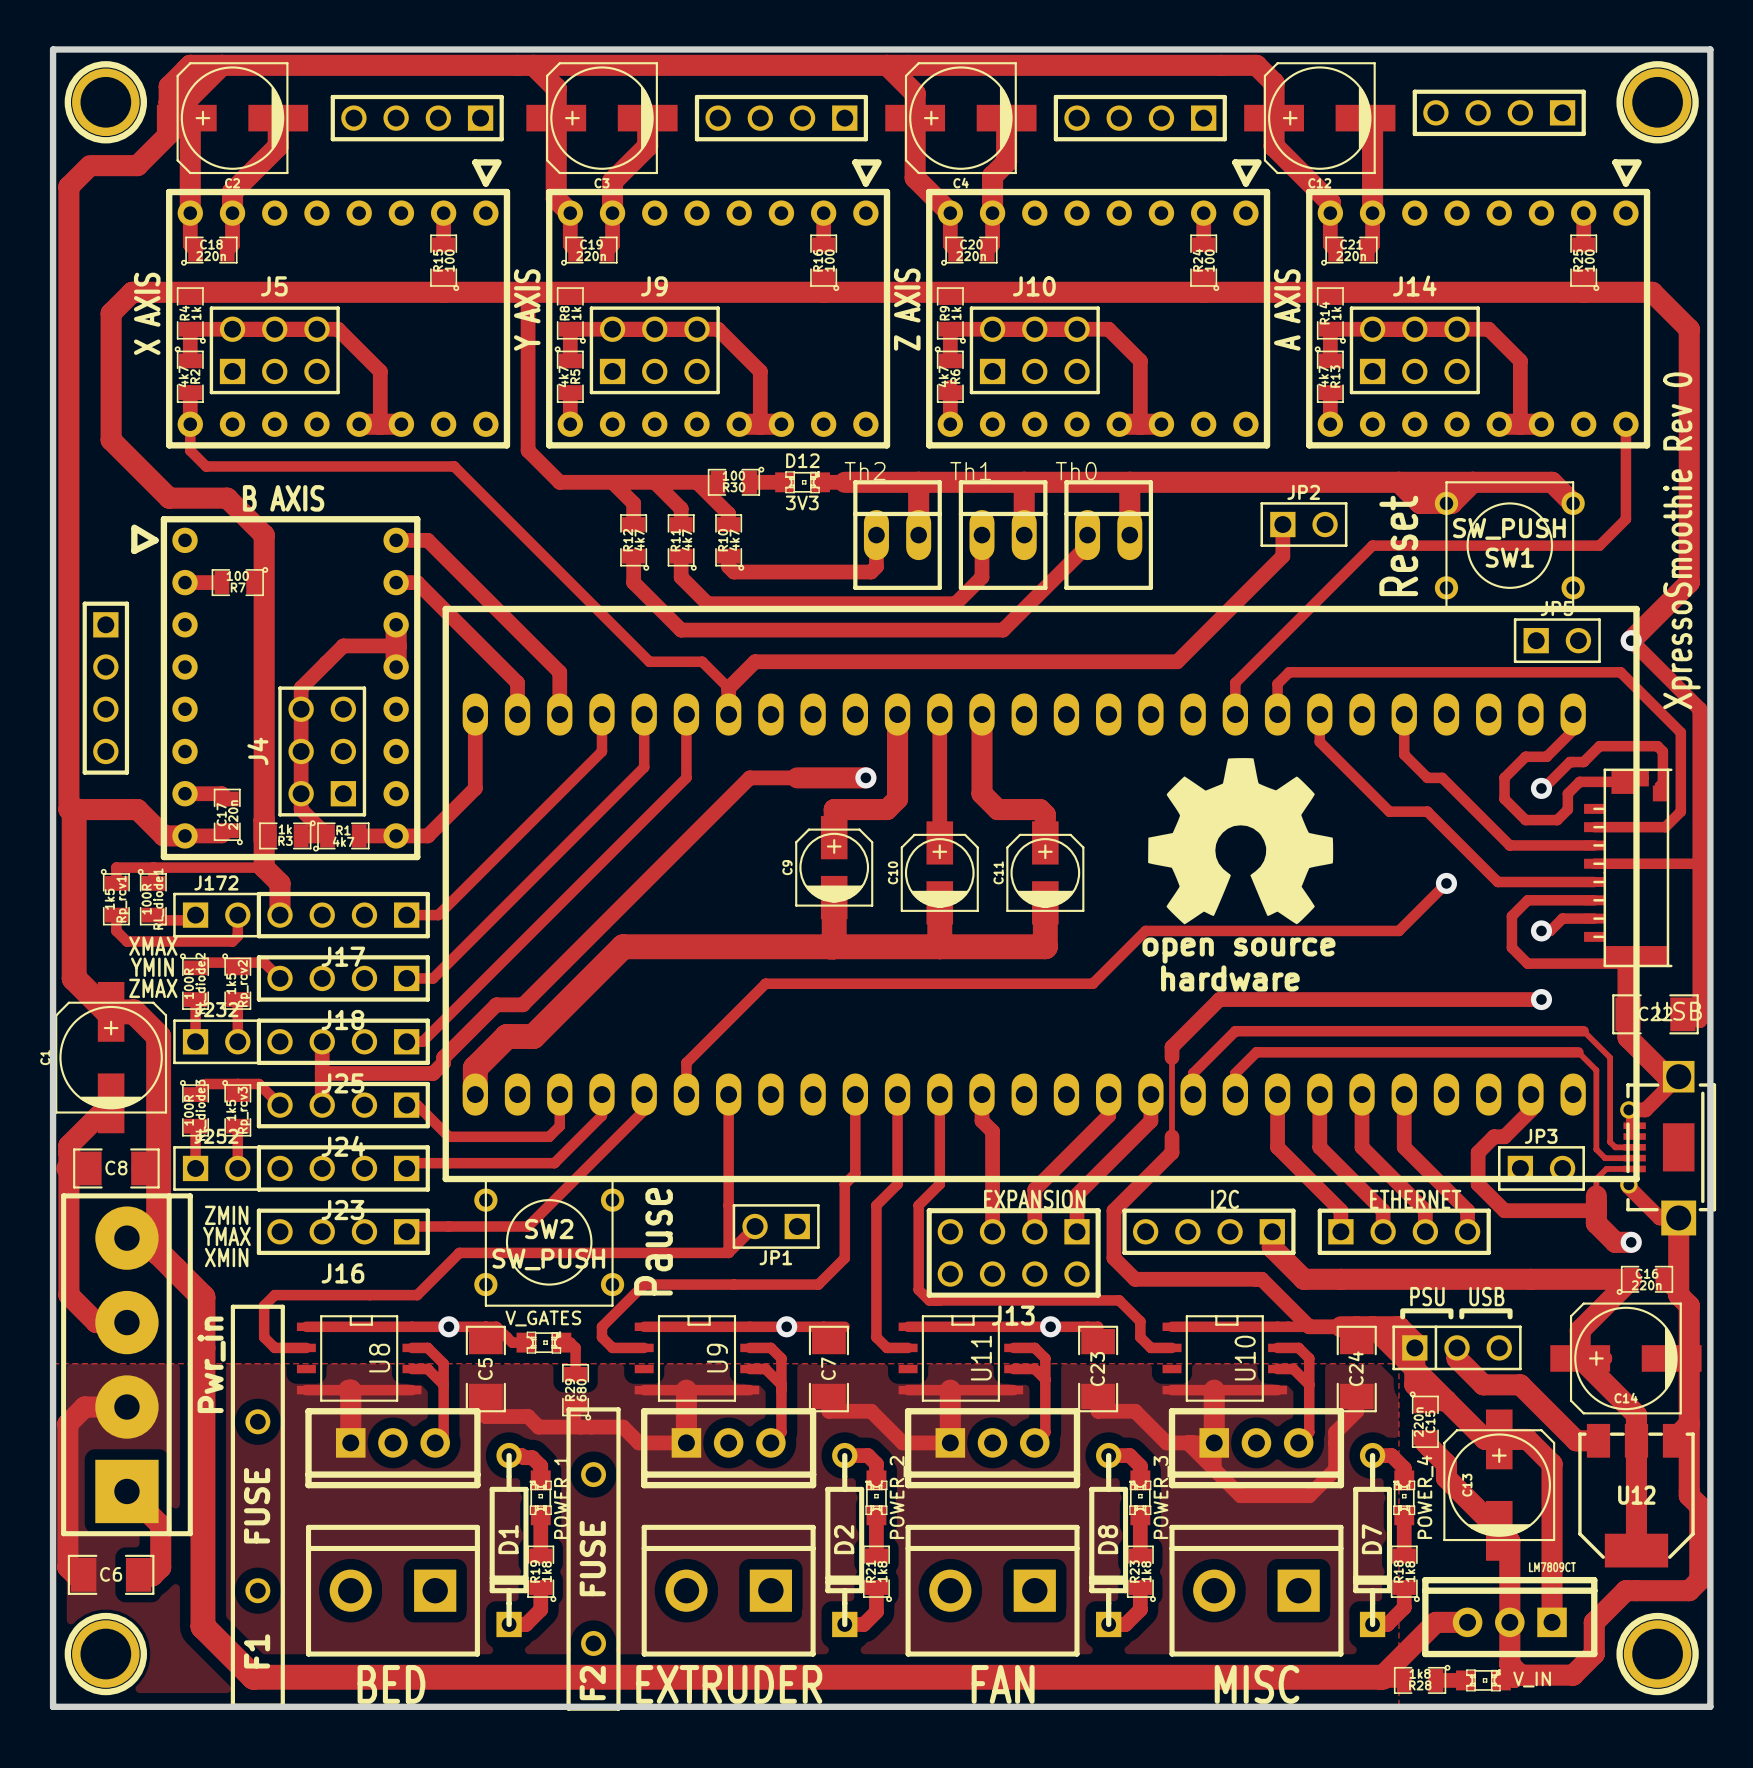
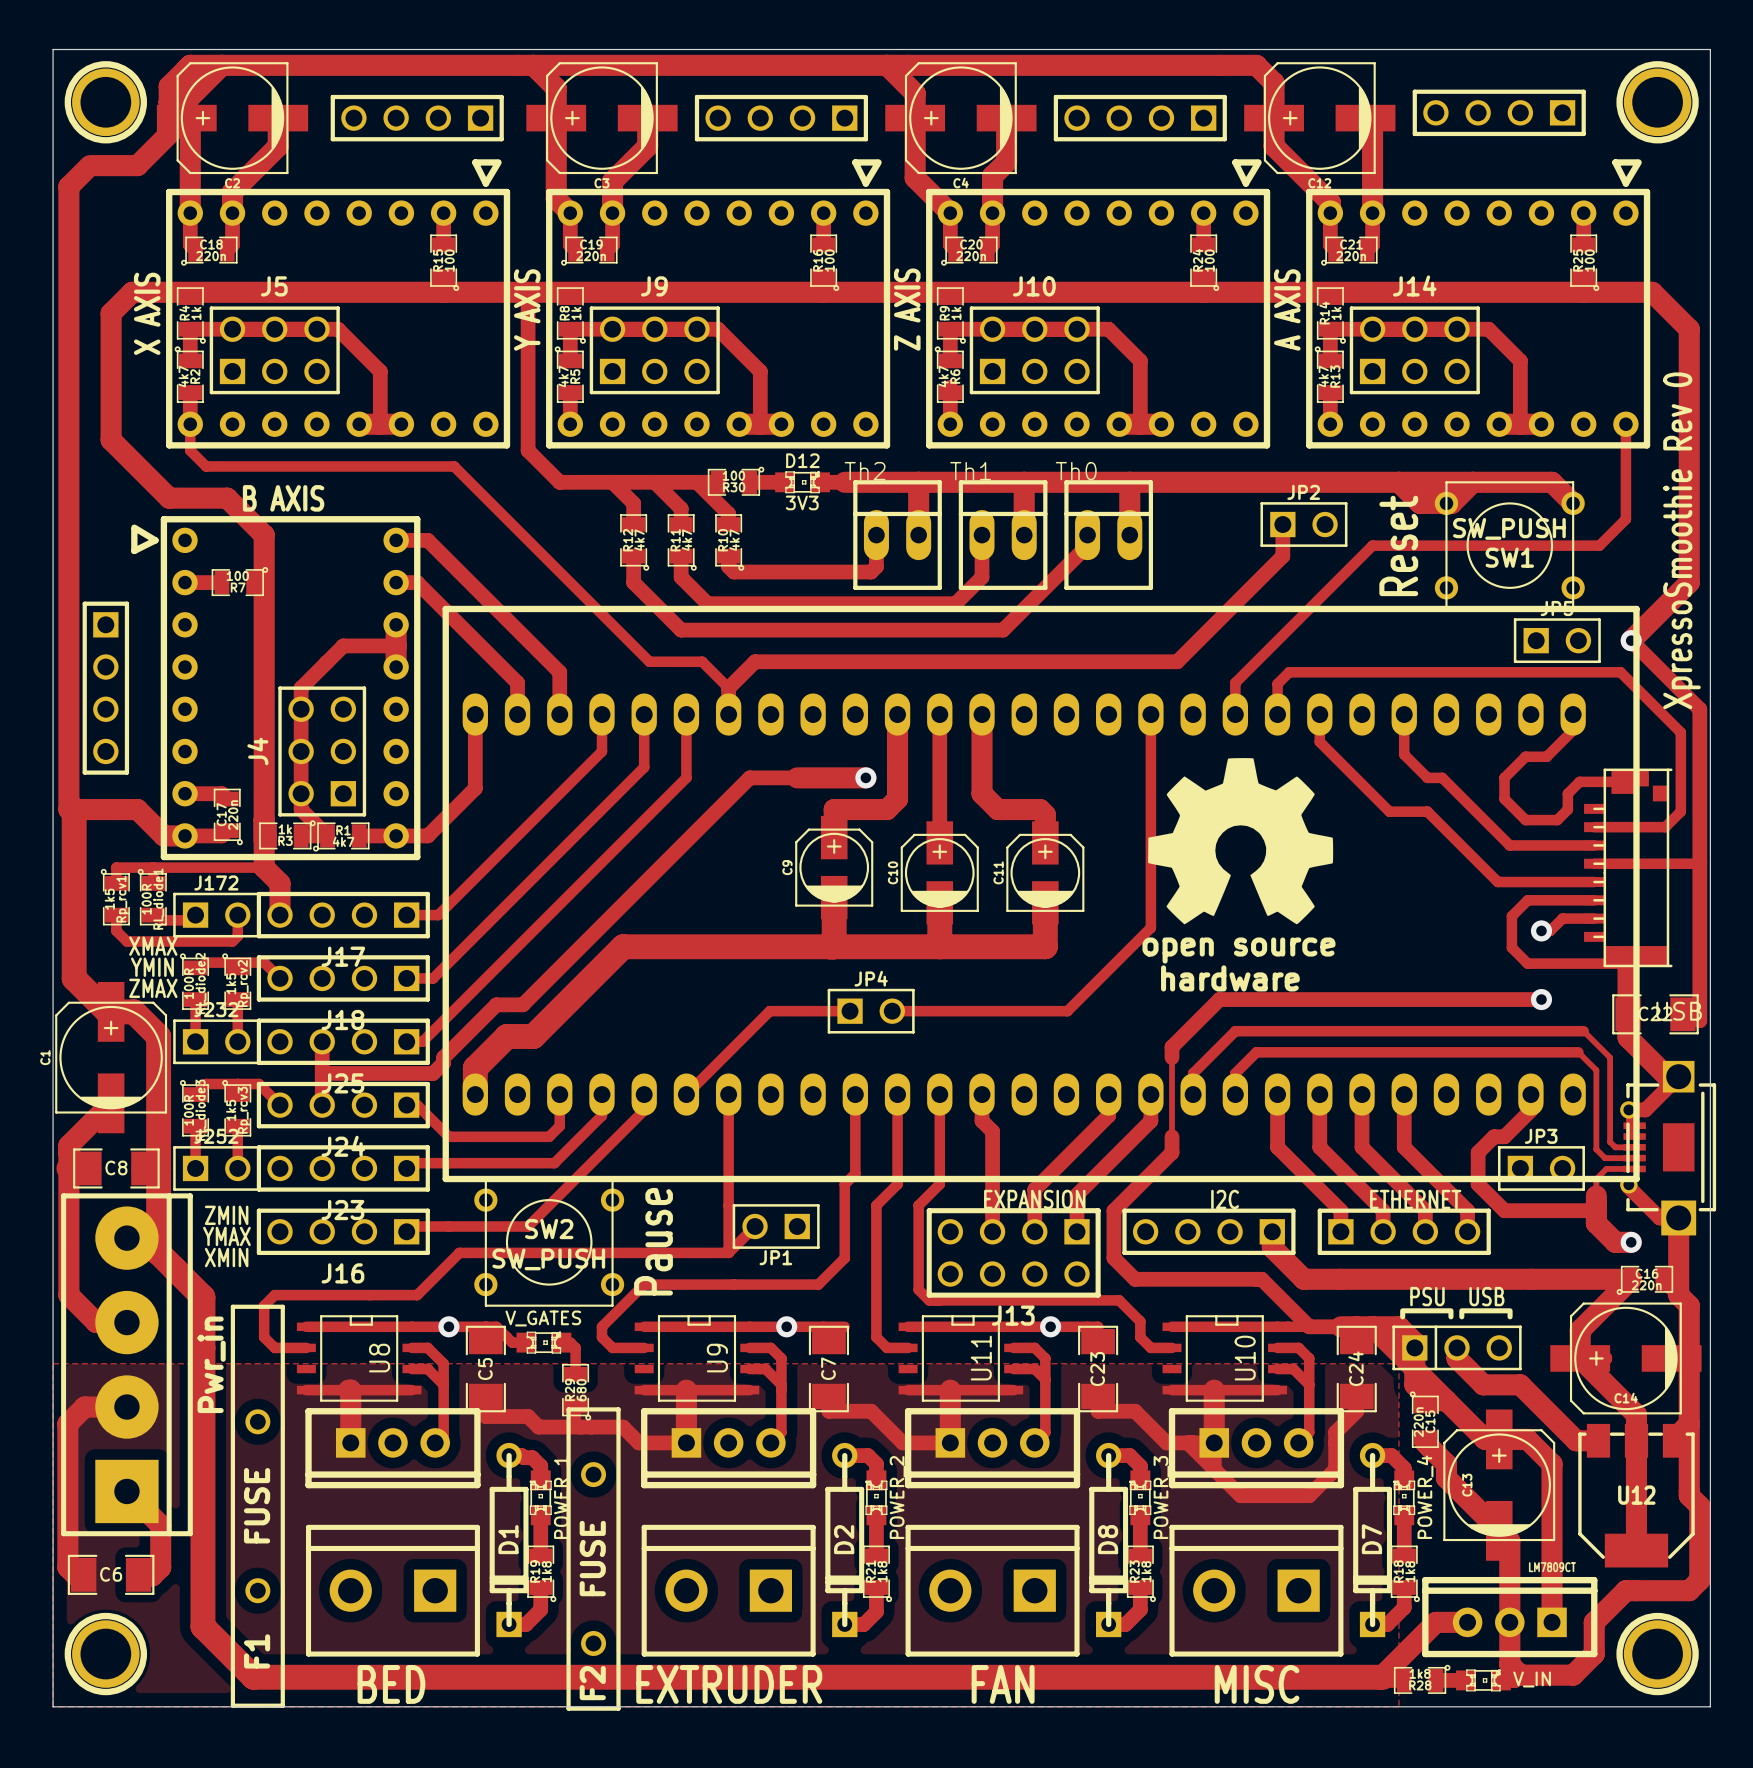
board edge width: thick (53, 49) (53, 1706) (1710, 1706) (1710, 49) (53, 49) -> thin (53, 49) (53, 1706) (1710, 1706) (1710, 49) (53, 49)
track: none -> (1150, 714) (1150, 927) (1067, 1011) (892, 1011)
track: (1541, 788) (1569, 762) (1583, 762) (1599, 746) (1657, 746) (1662, 751) (1662, 783) (1659, 786) (1659, 793) -> none
via: (1541, 788) -> none
track: (1446, 883) (1398, 930) (1145, 930) (1092, 983) (765, 983) (686, 1062) (686, 1094) -> (850, 1011) (769, 1011) (686, 1094)
via: (1446, 883) -> none
JP4: none -> (871, 1011)

